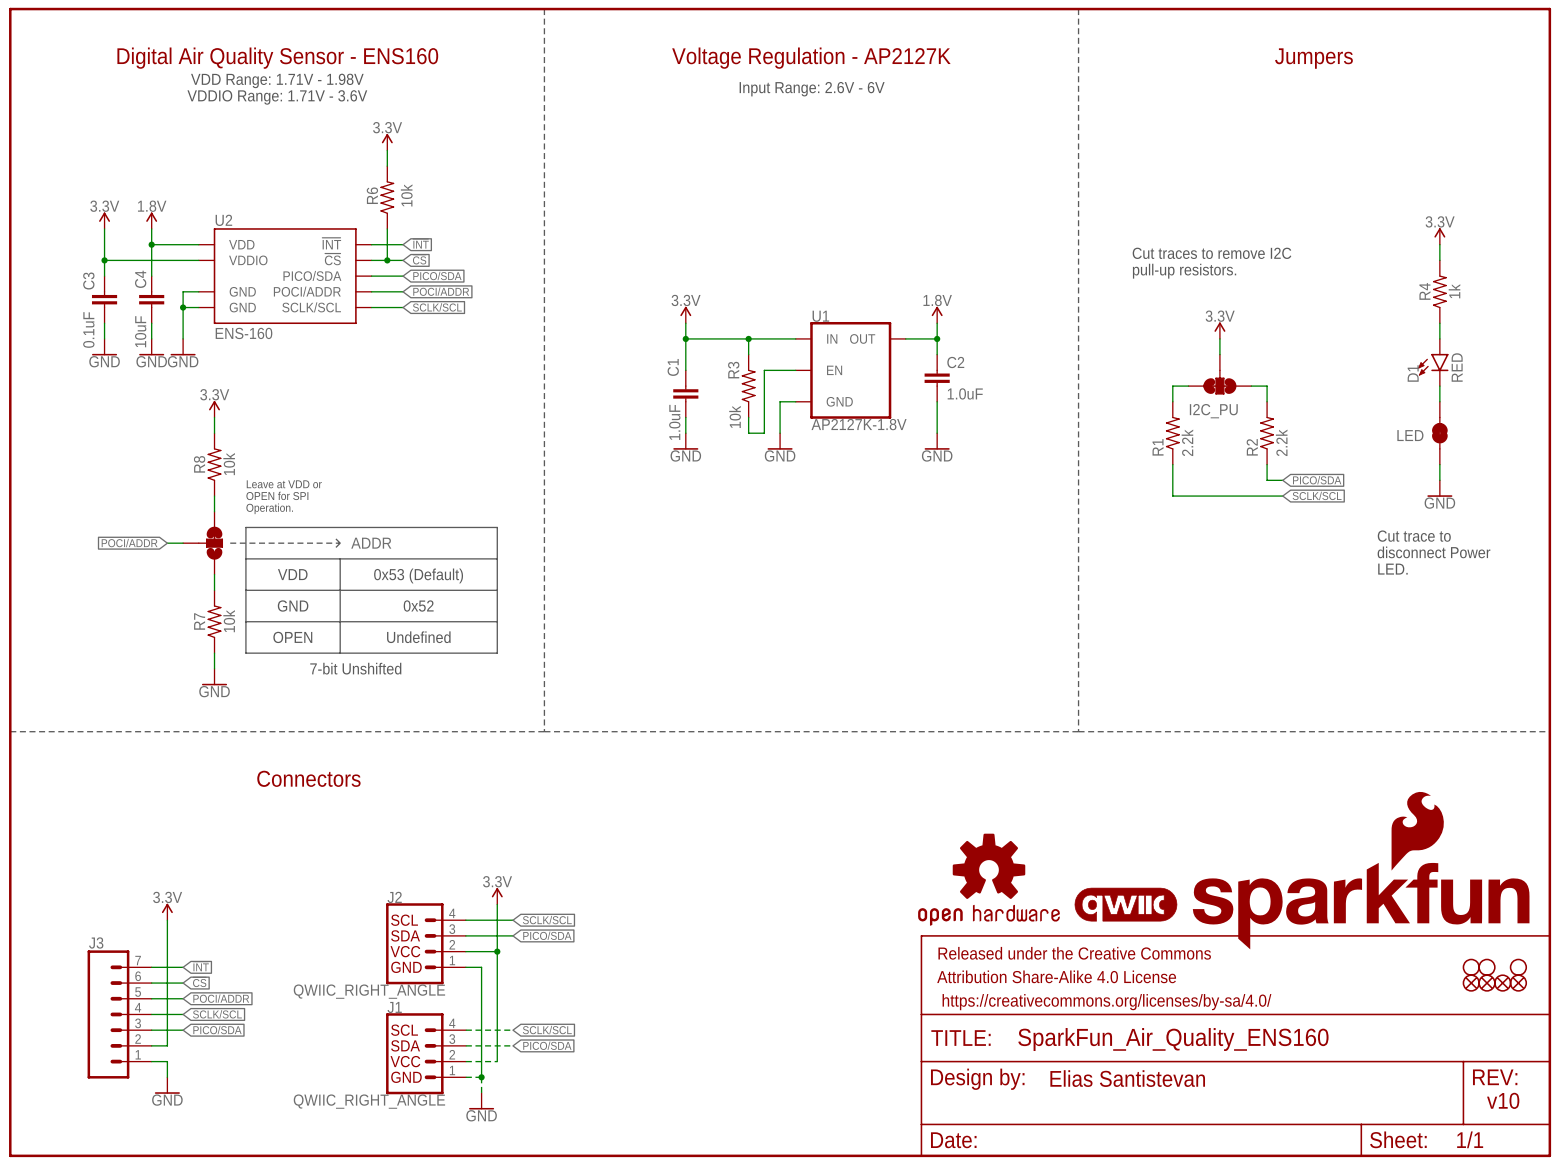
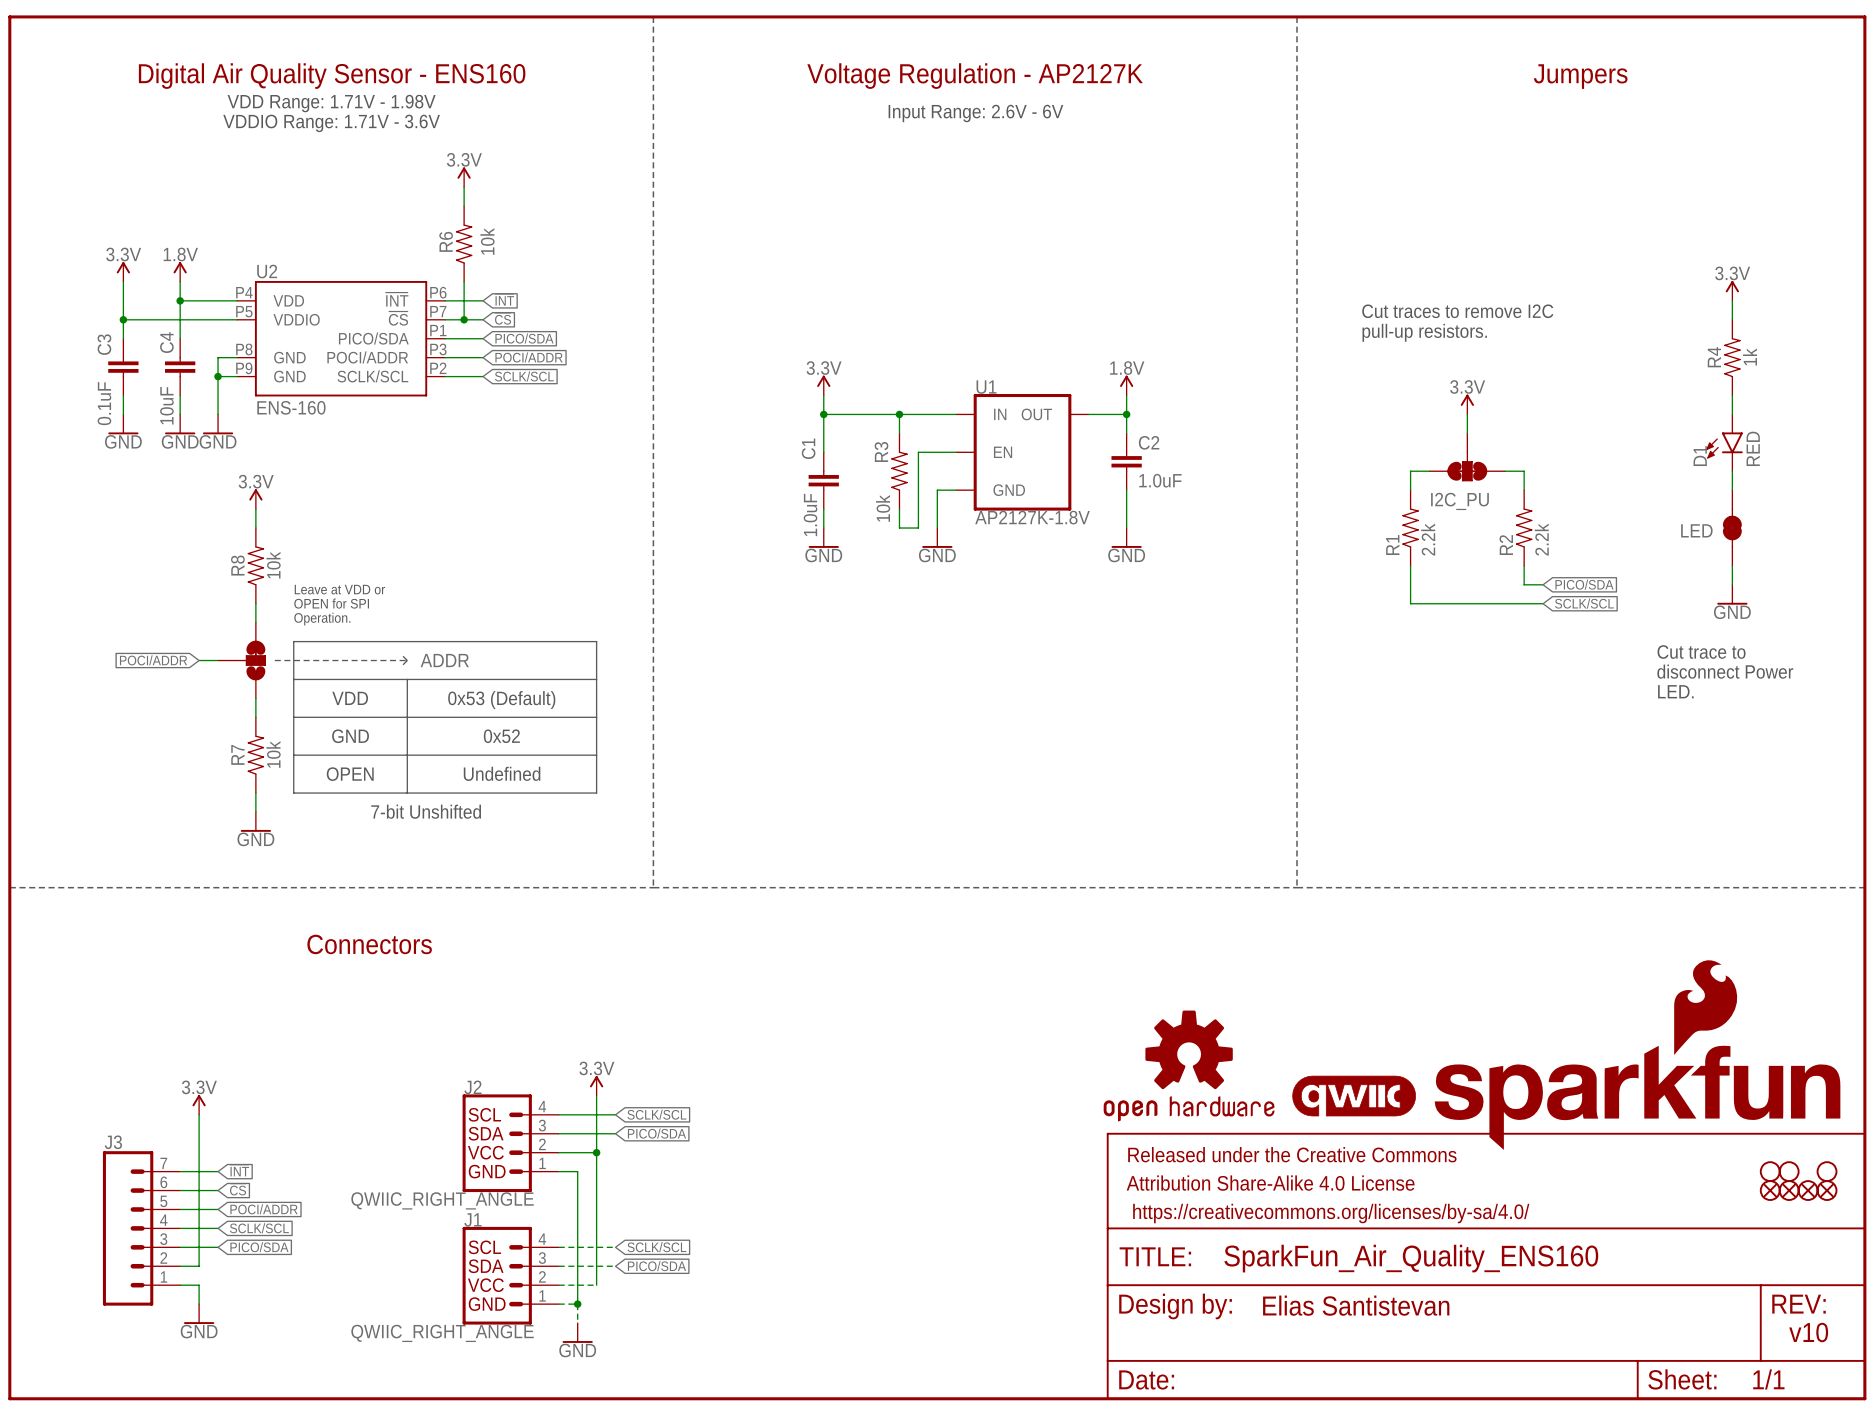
U2 symbol: [198, 228, 372, 325] -> [236, 280, 446, 397]

